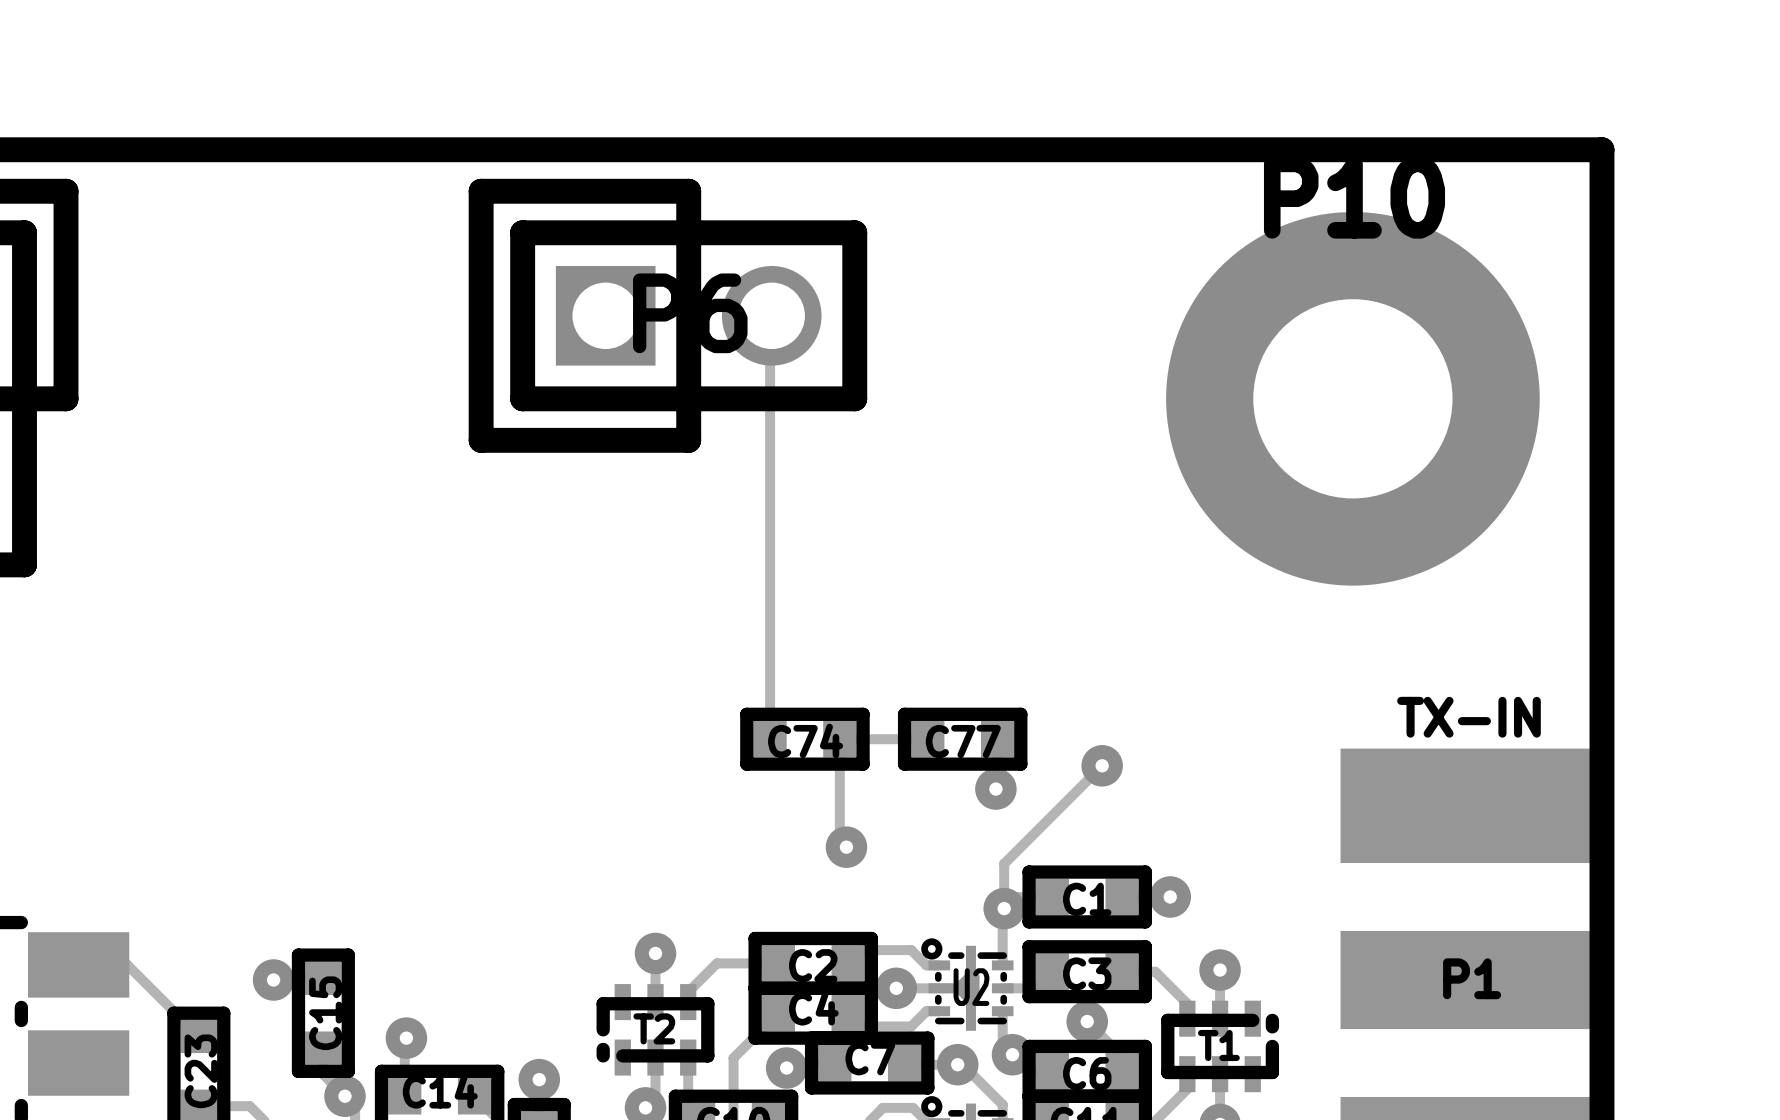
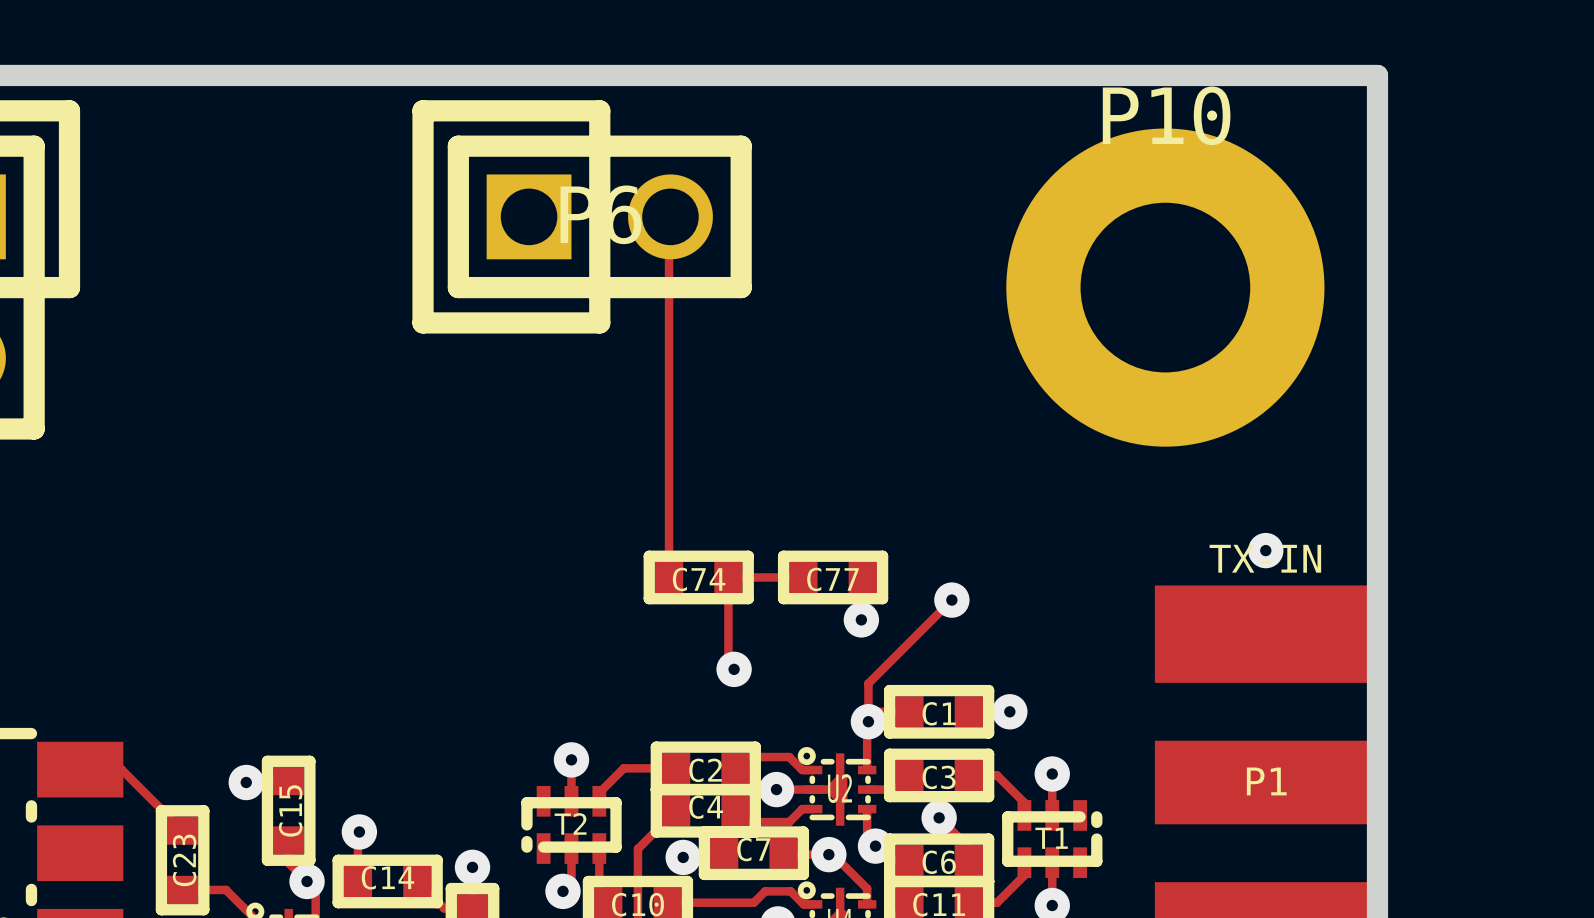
via: none -> (1265, 550)

